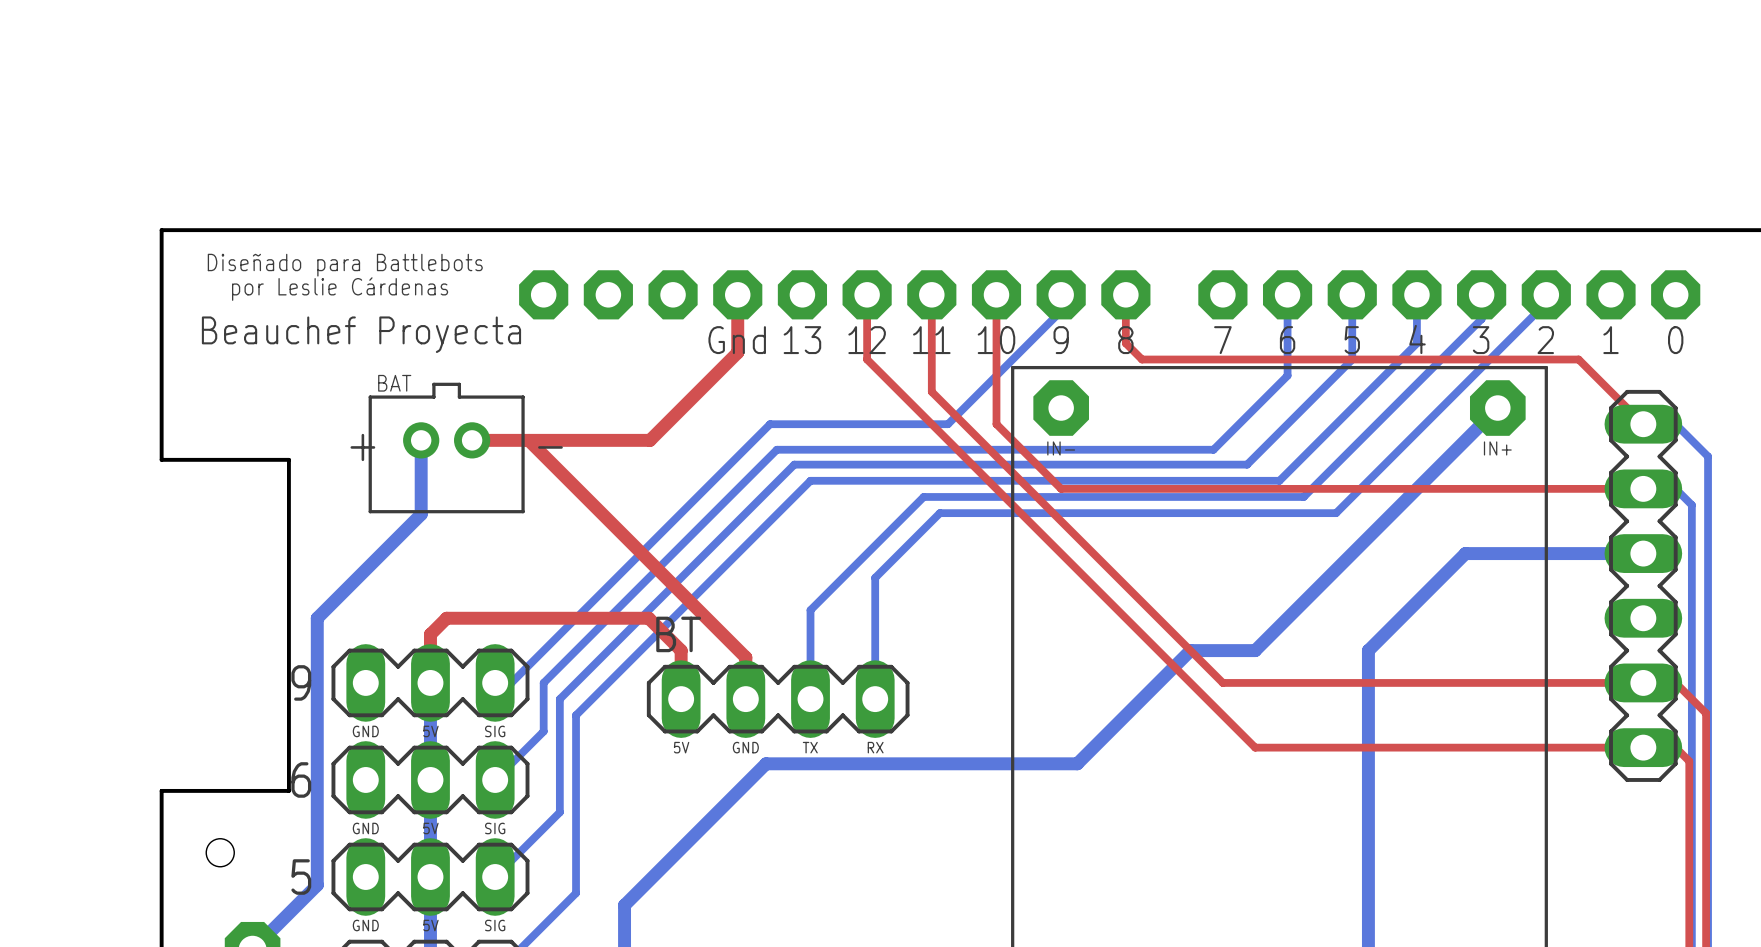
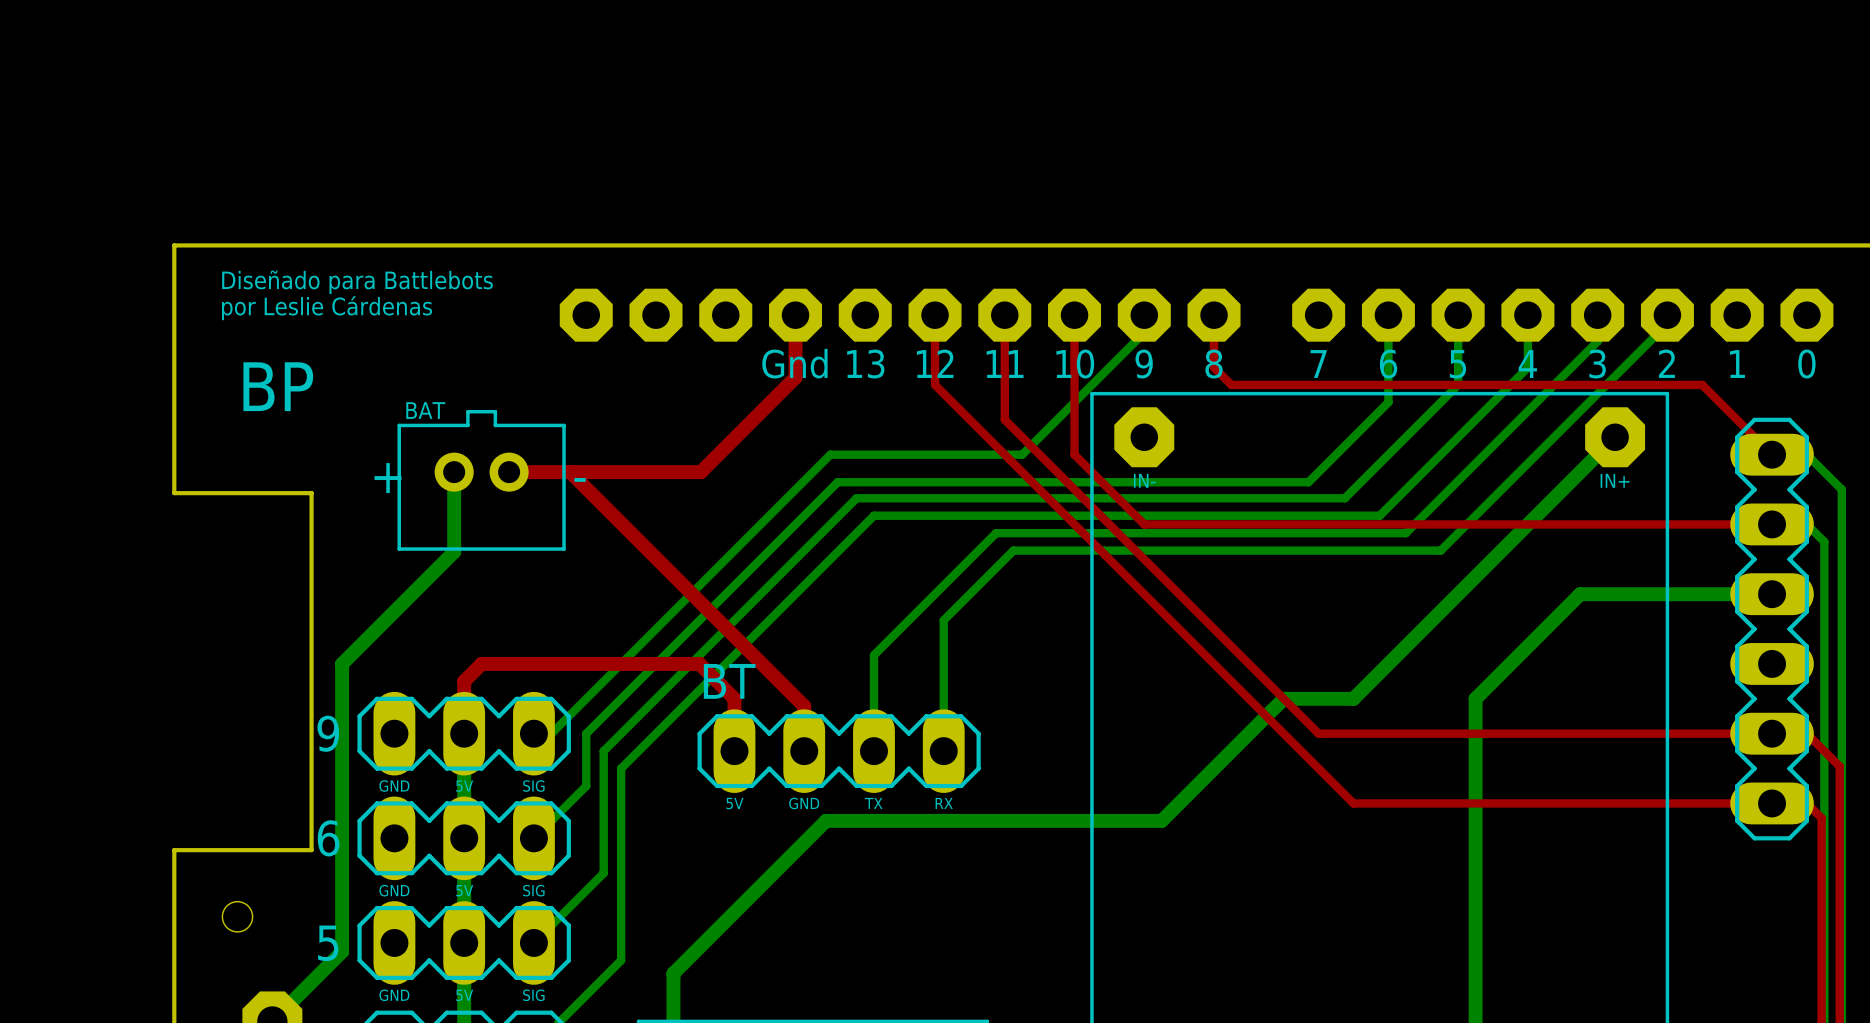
text position: por Leslie Cárdenas (340, 289) -> por Leslie Cárdenas (327, 308)
text: Beauchef Proyecta (361, 334) -> none
text: none -> BP (278, 386)

